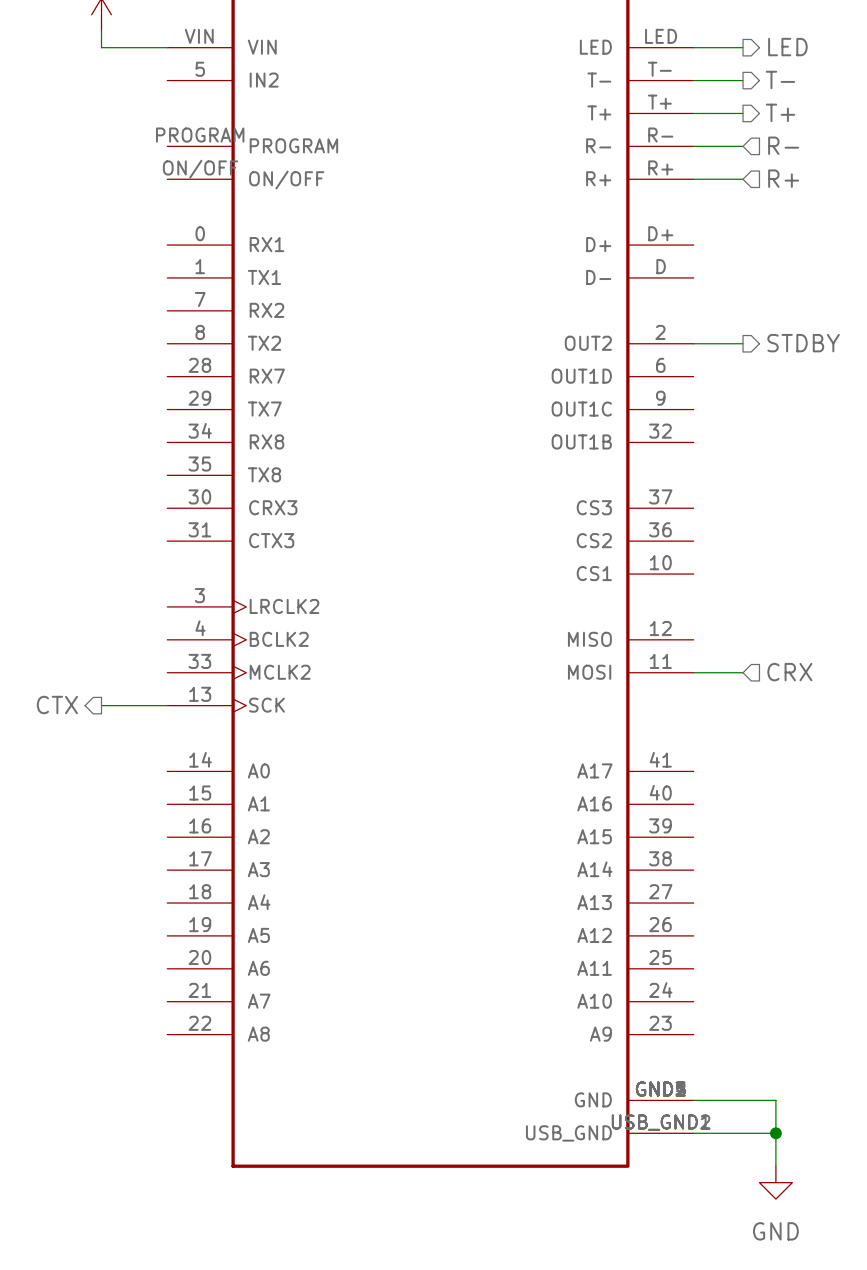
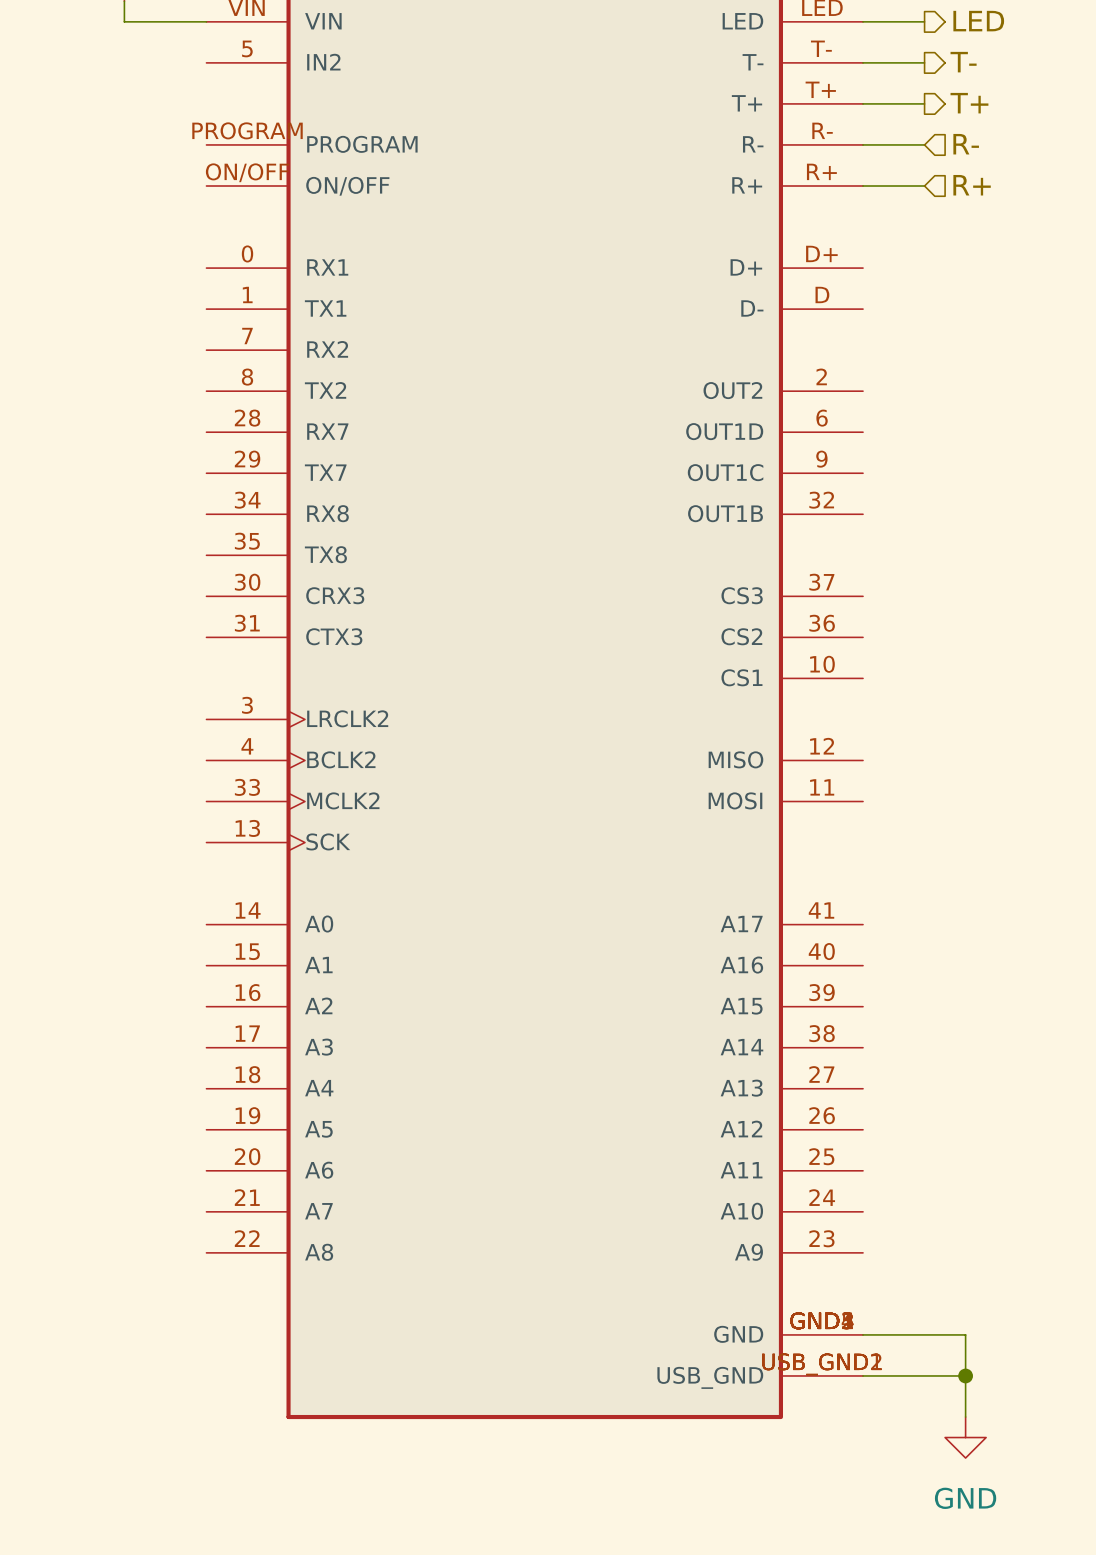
wire: (693, 343) (743, 343) -> none
hierarchical label: STDBY (803, 343) -> none
wire: (693, 672) (743, 672) -> none
hierarchical label: CRX (789, 672) -> none
hierarchical label: CTX (57, 705) -> none
wire: (101, 705) (167, 705) -> none

